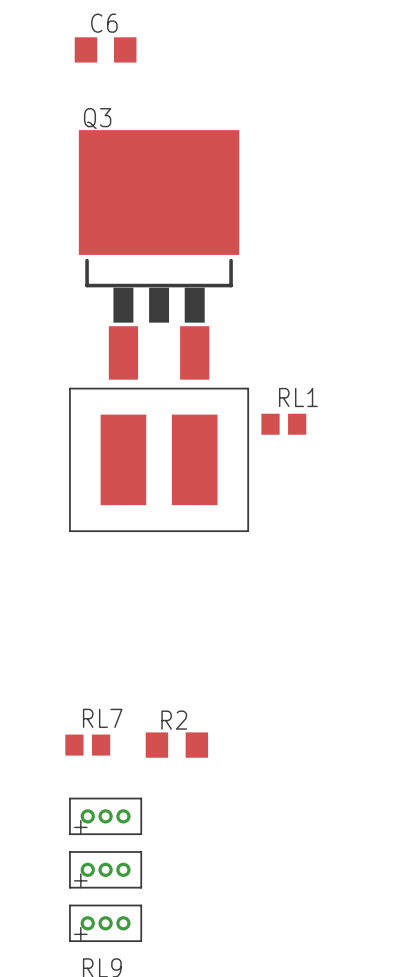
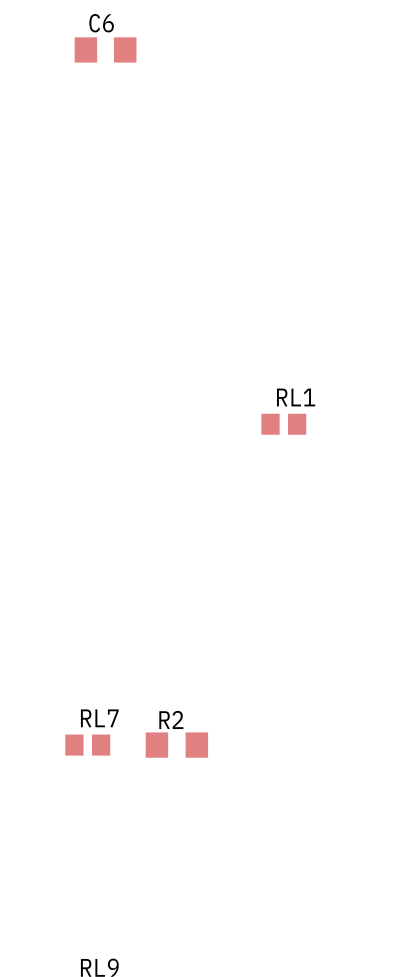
Q3: (159, 254) -> none
part: (159, 459) -> none
part: (105, 816) -> none
part: (105, 869) -> none
part: (105, 923) -> none

